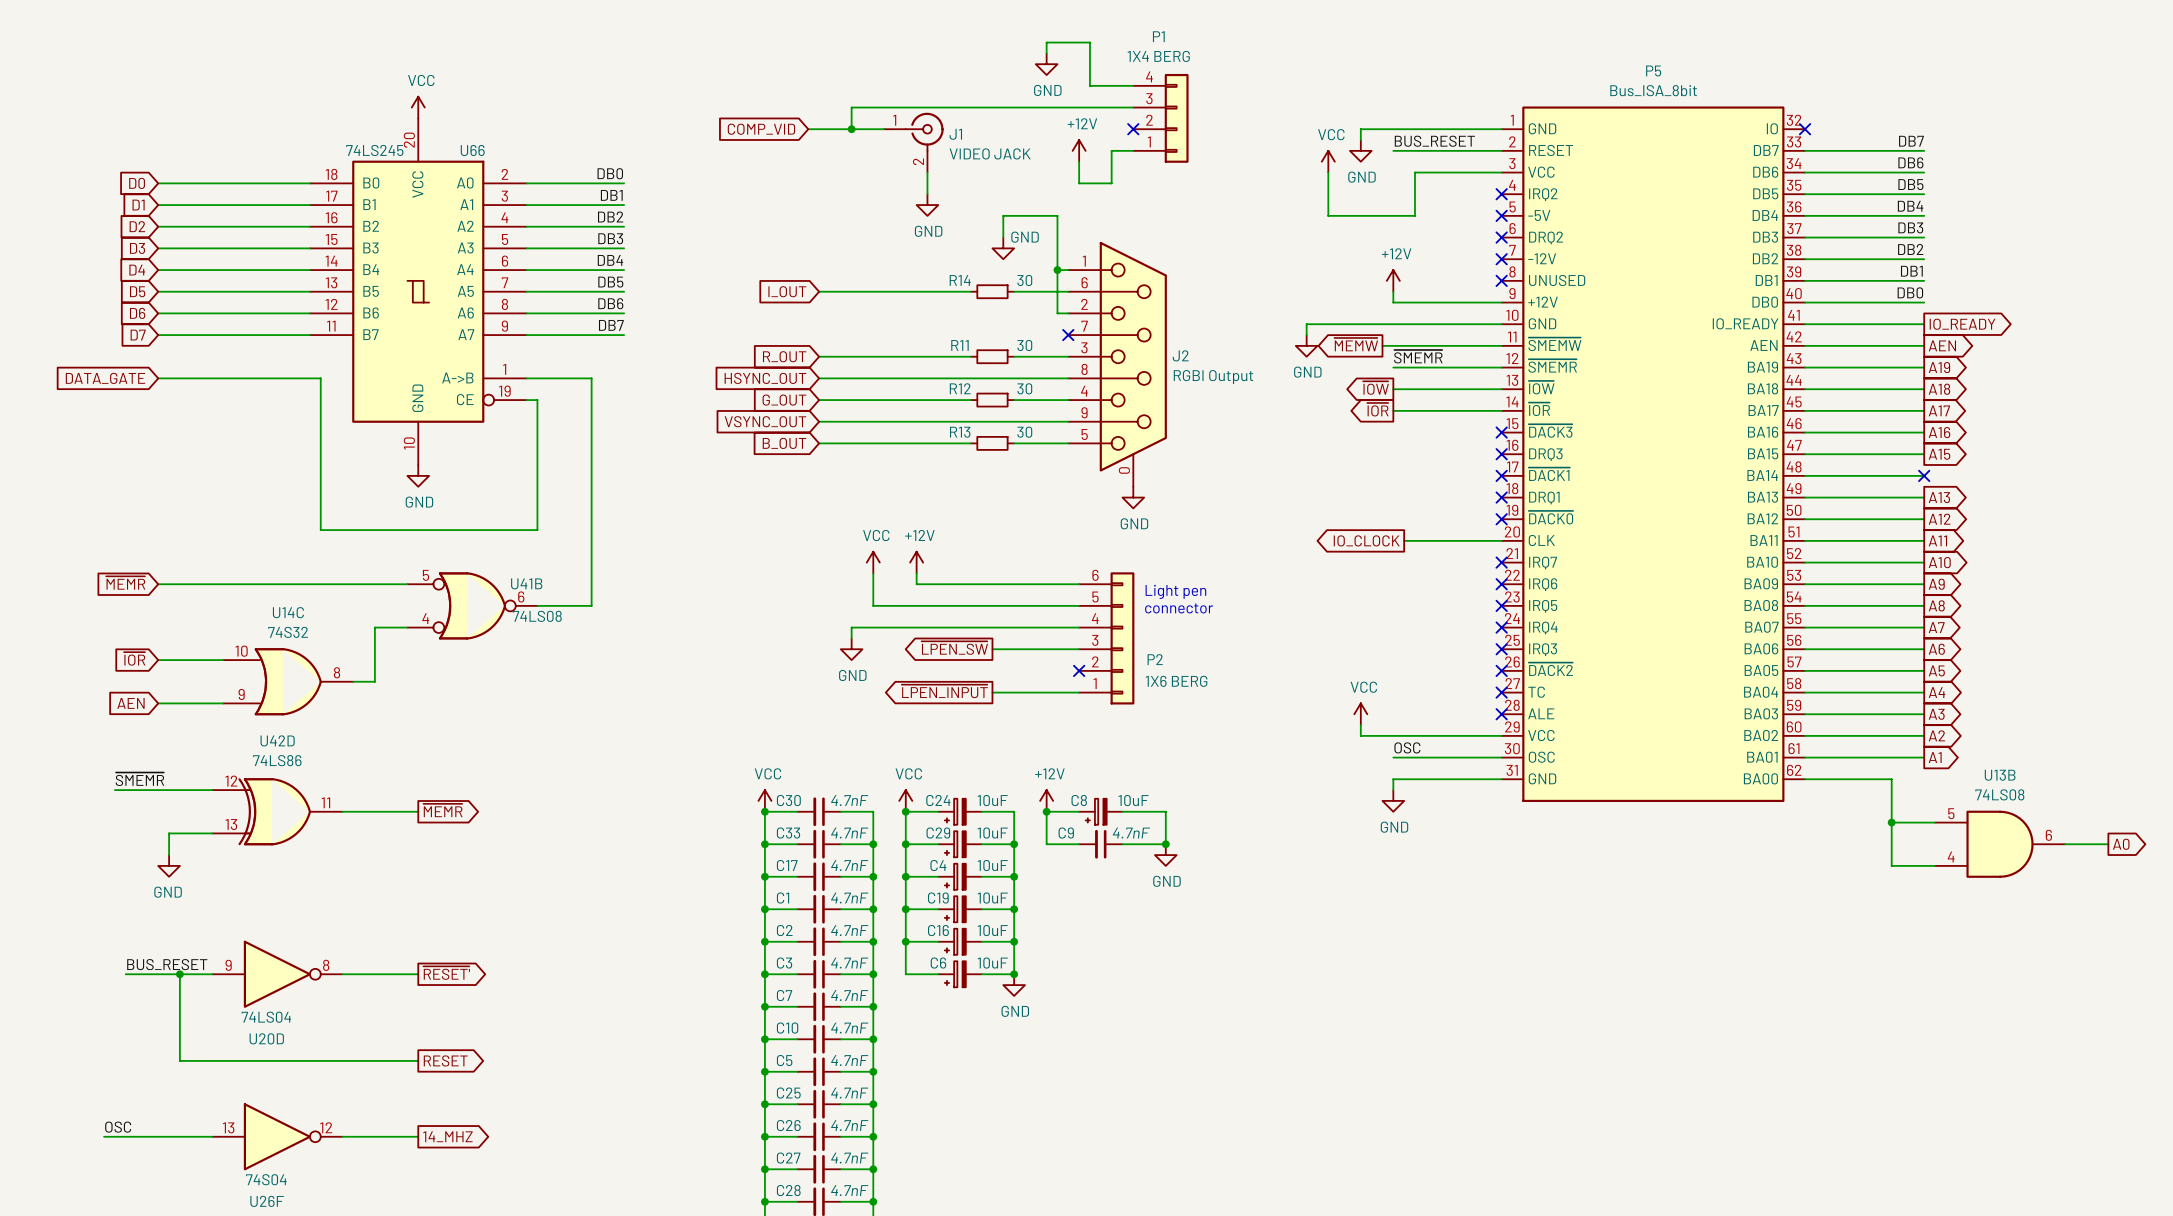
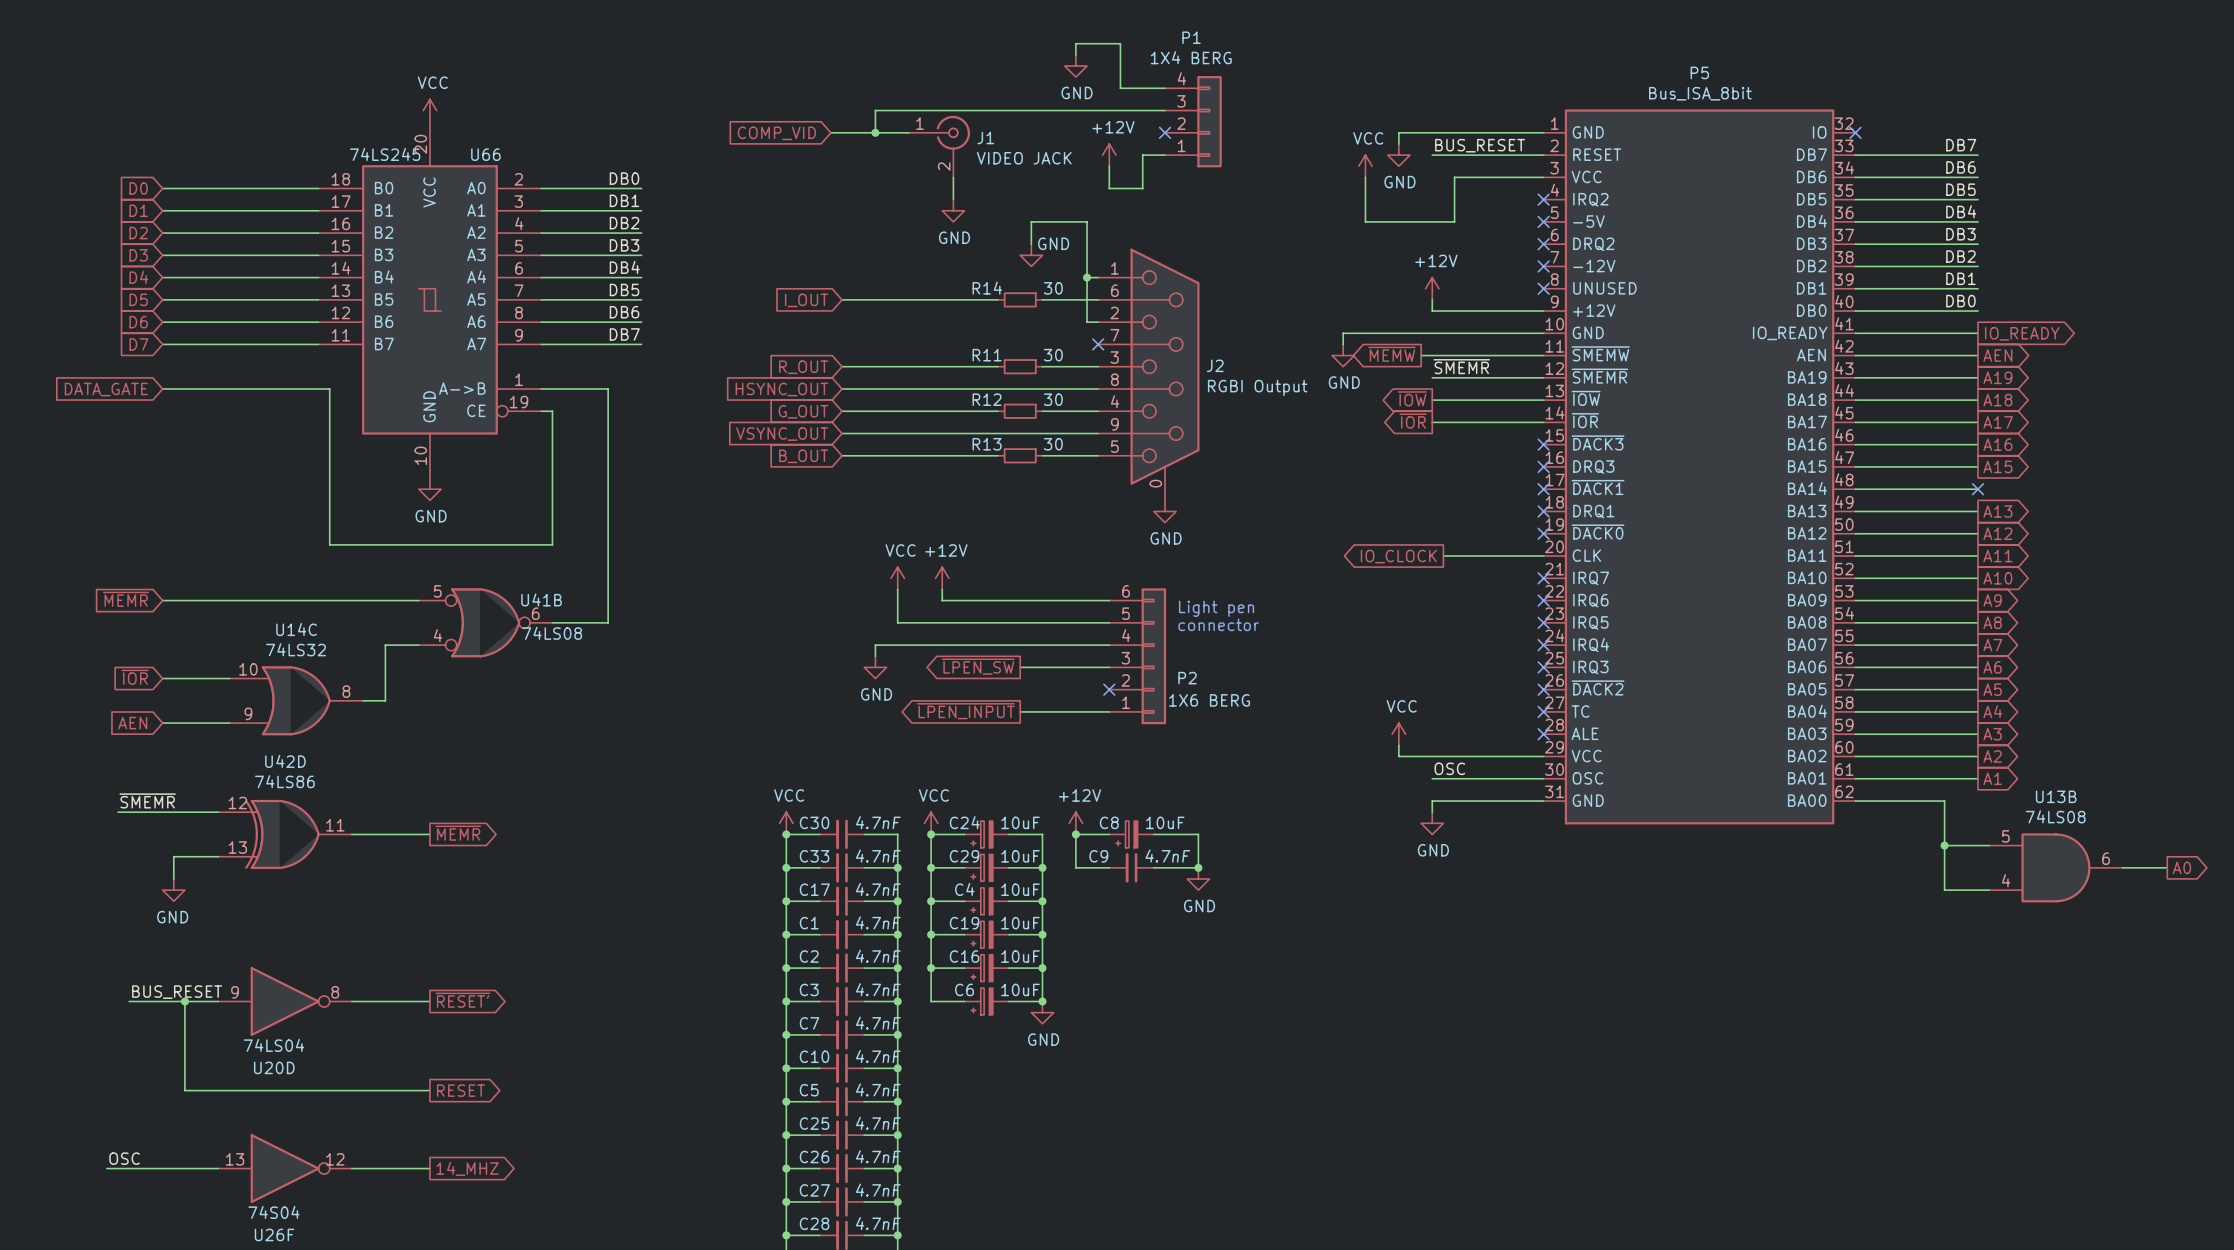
U14C value: 74S32 (288, 632) -> 74LS32 (296, 649)

